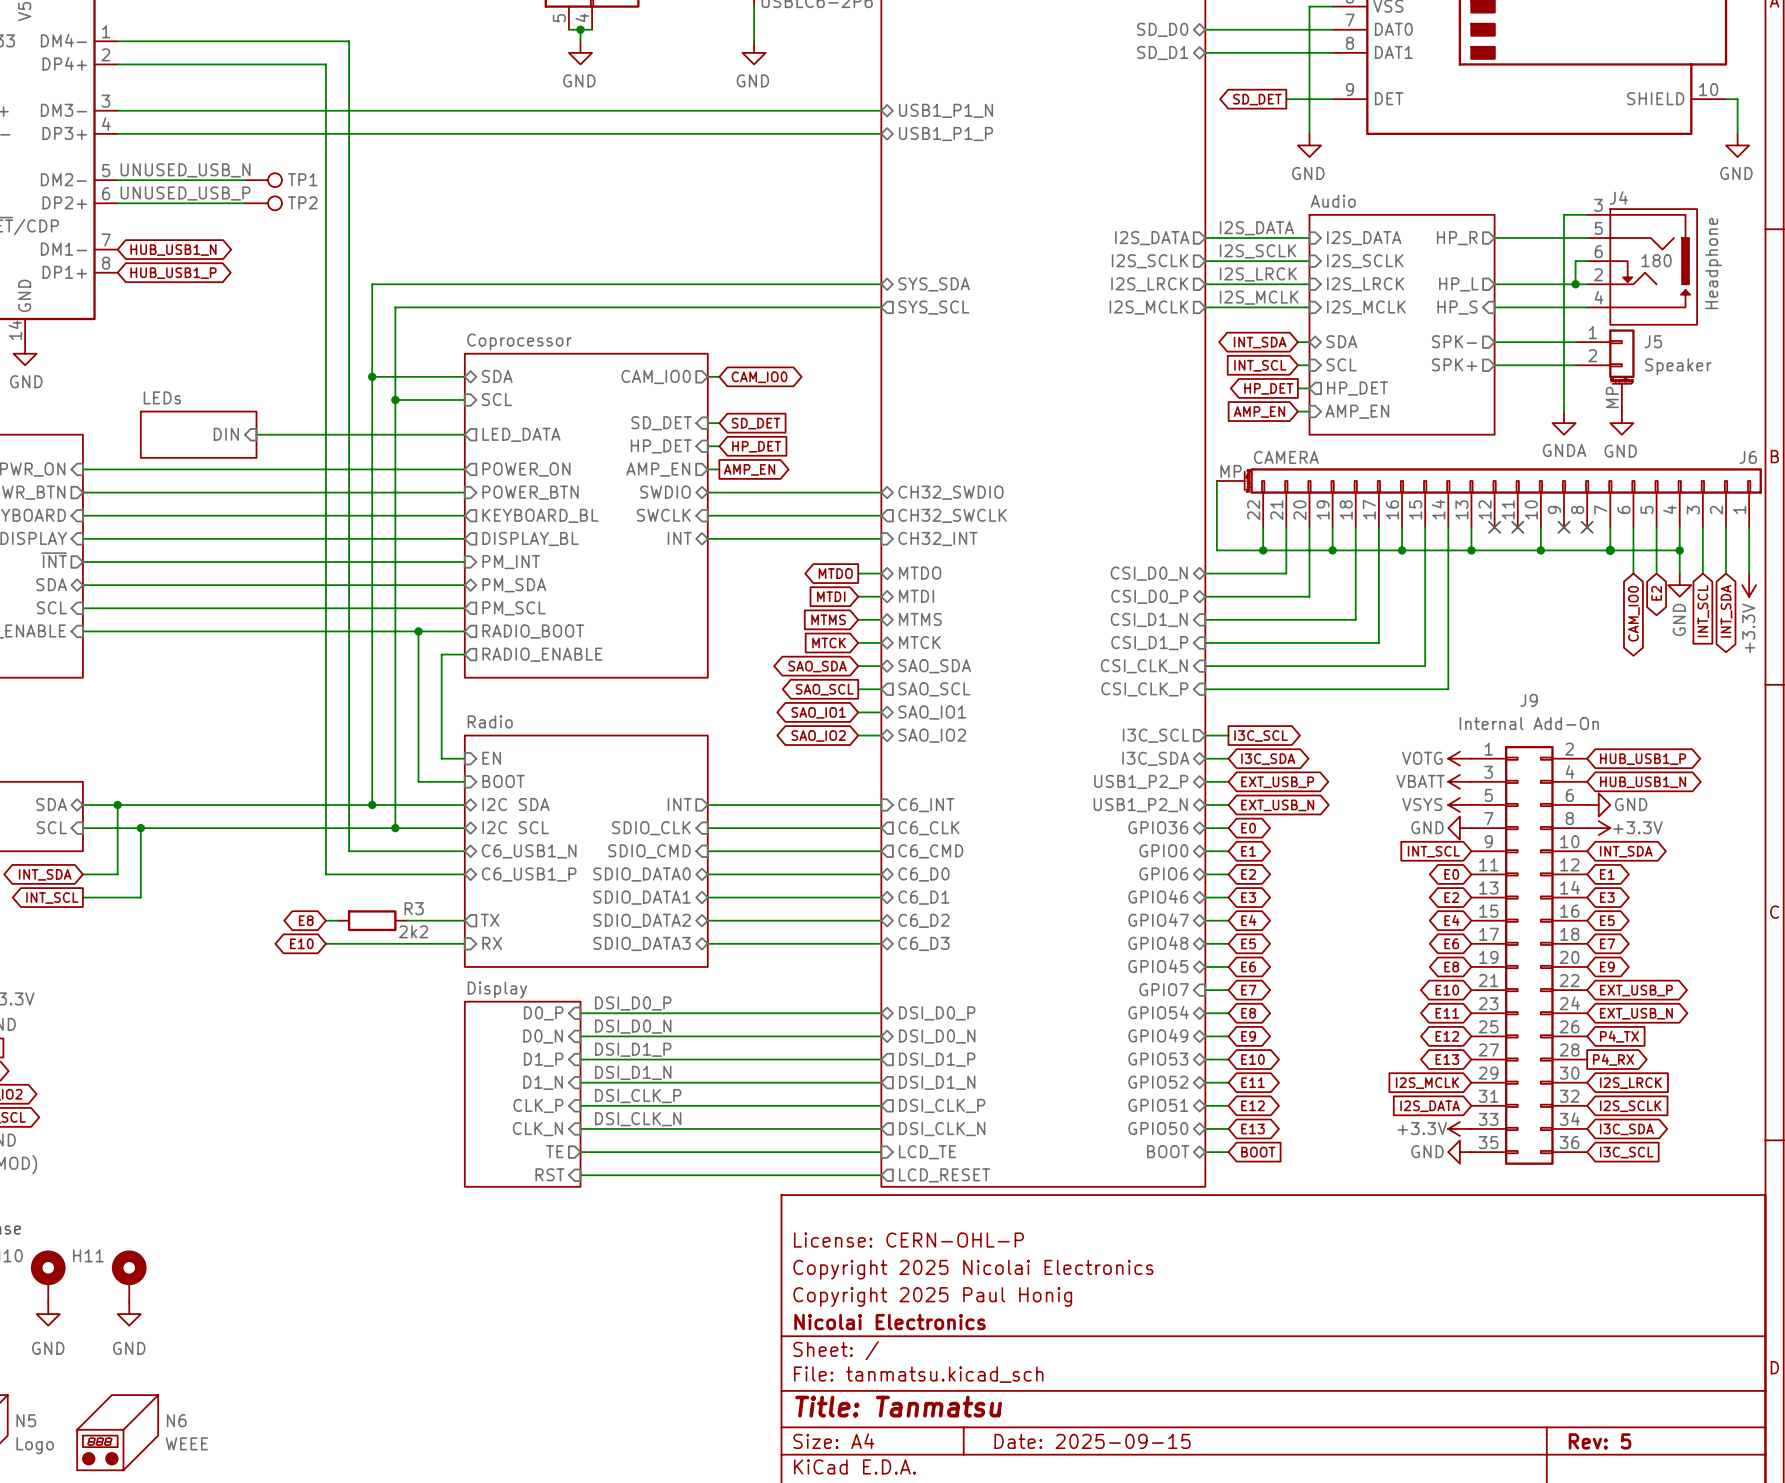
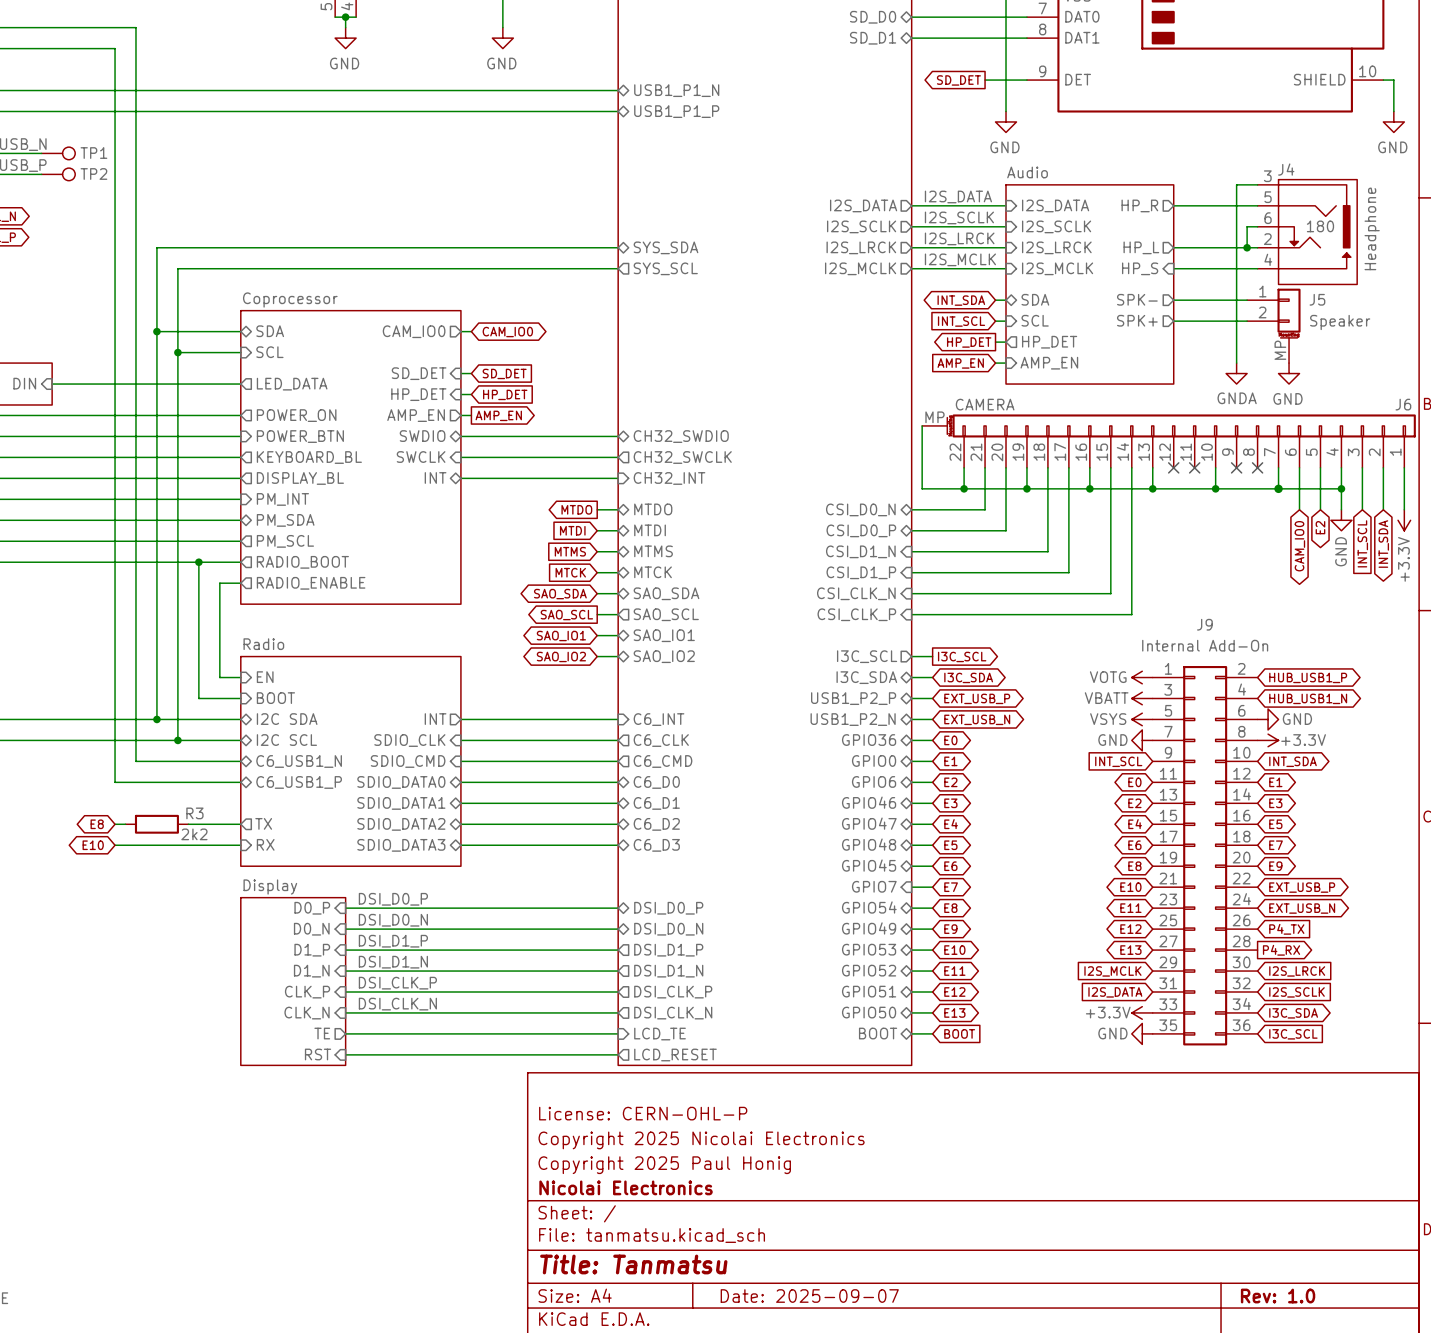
title block: Date: 2025-09-15 (1092, 1441) -> Date: 2025-09-07 (809, 1296)
title block: Rev: 5 (1600, 1441) -> Rev: 1.0 (1278, 1296)

